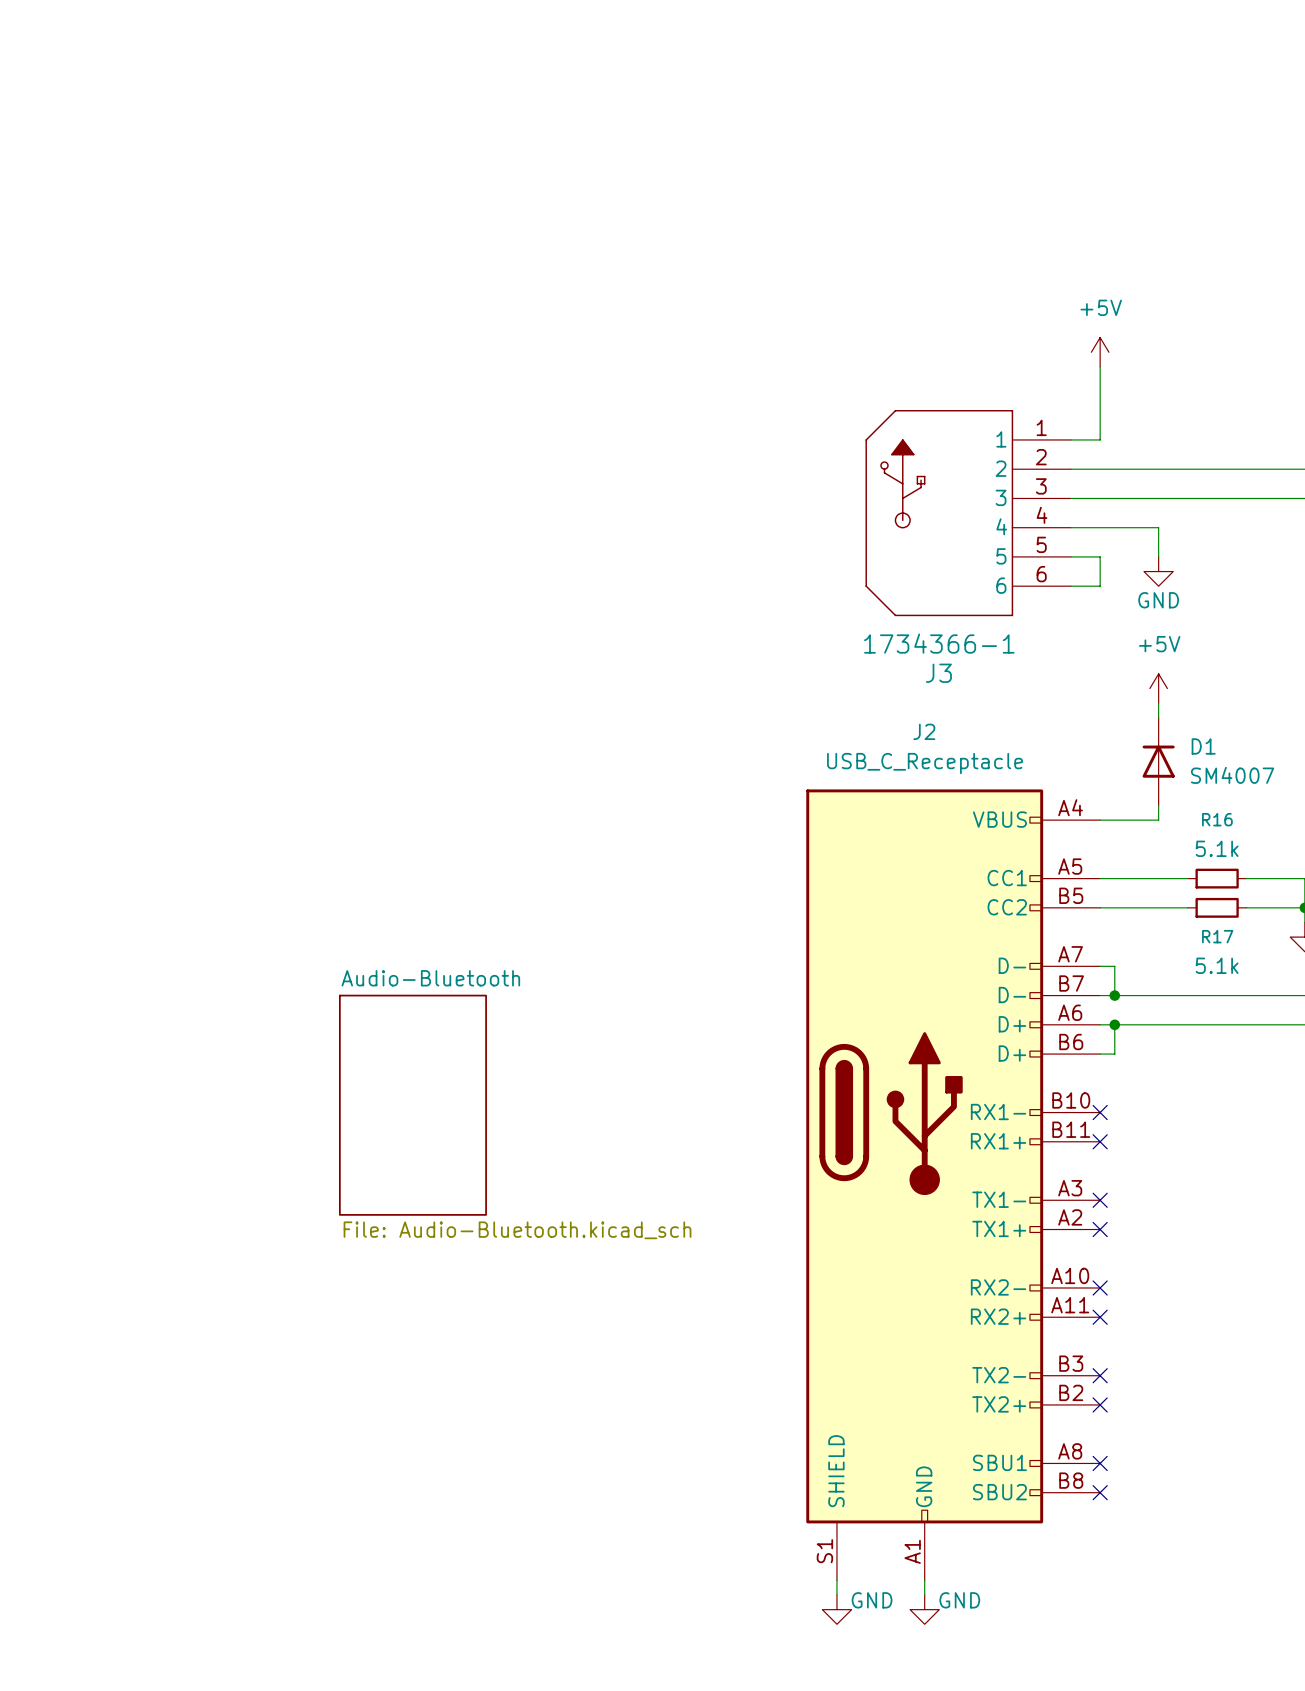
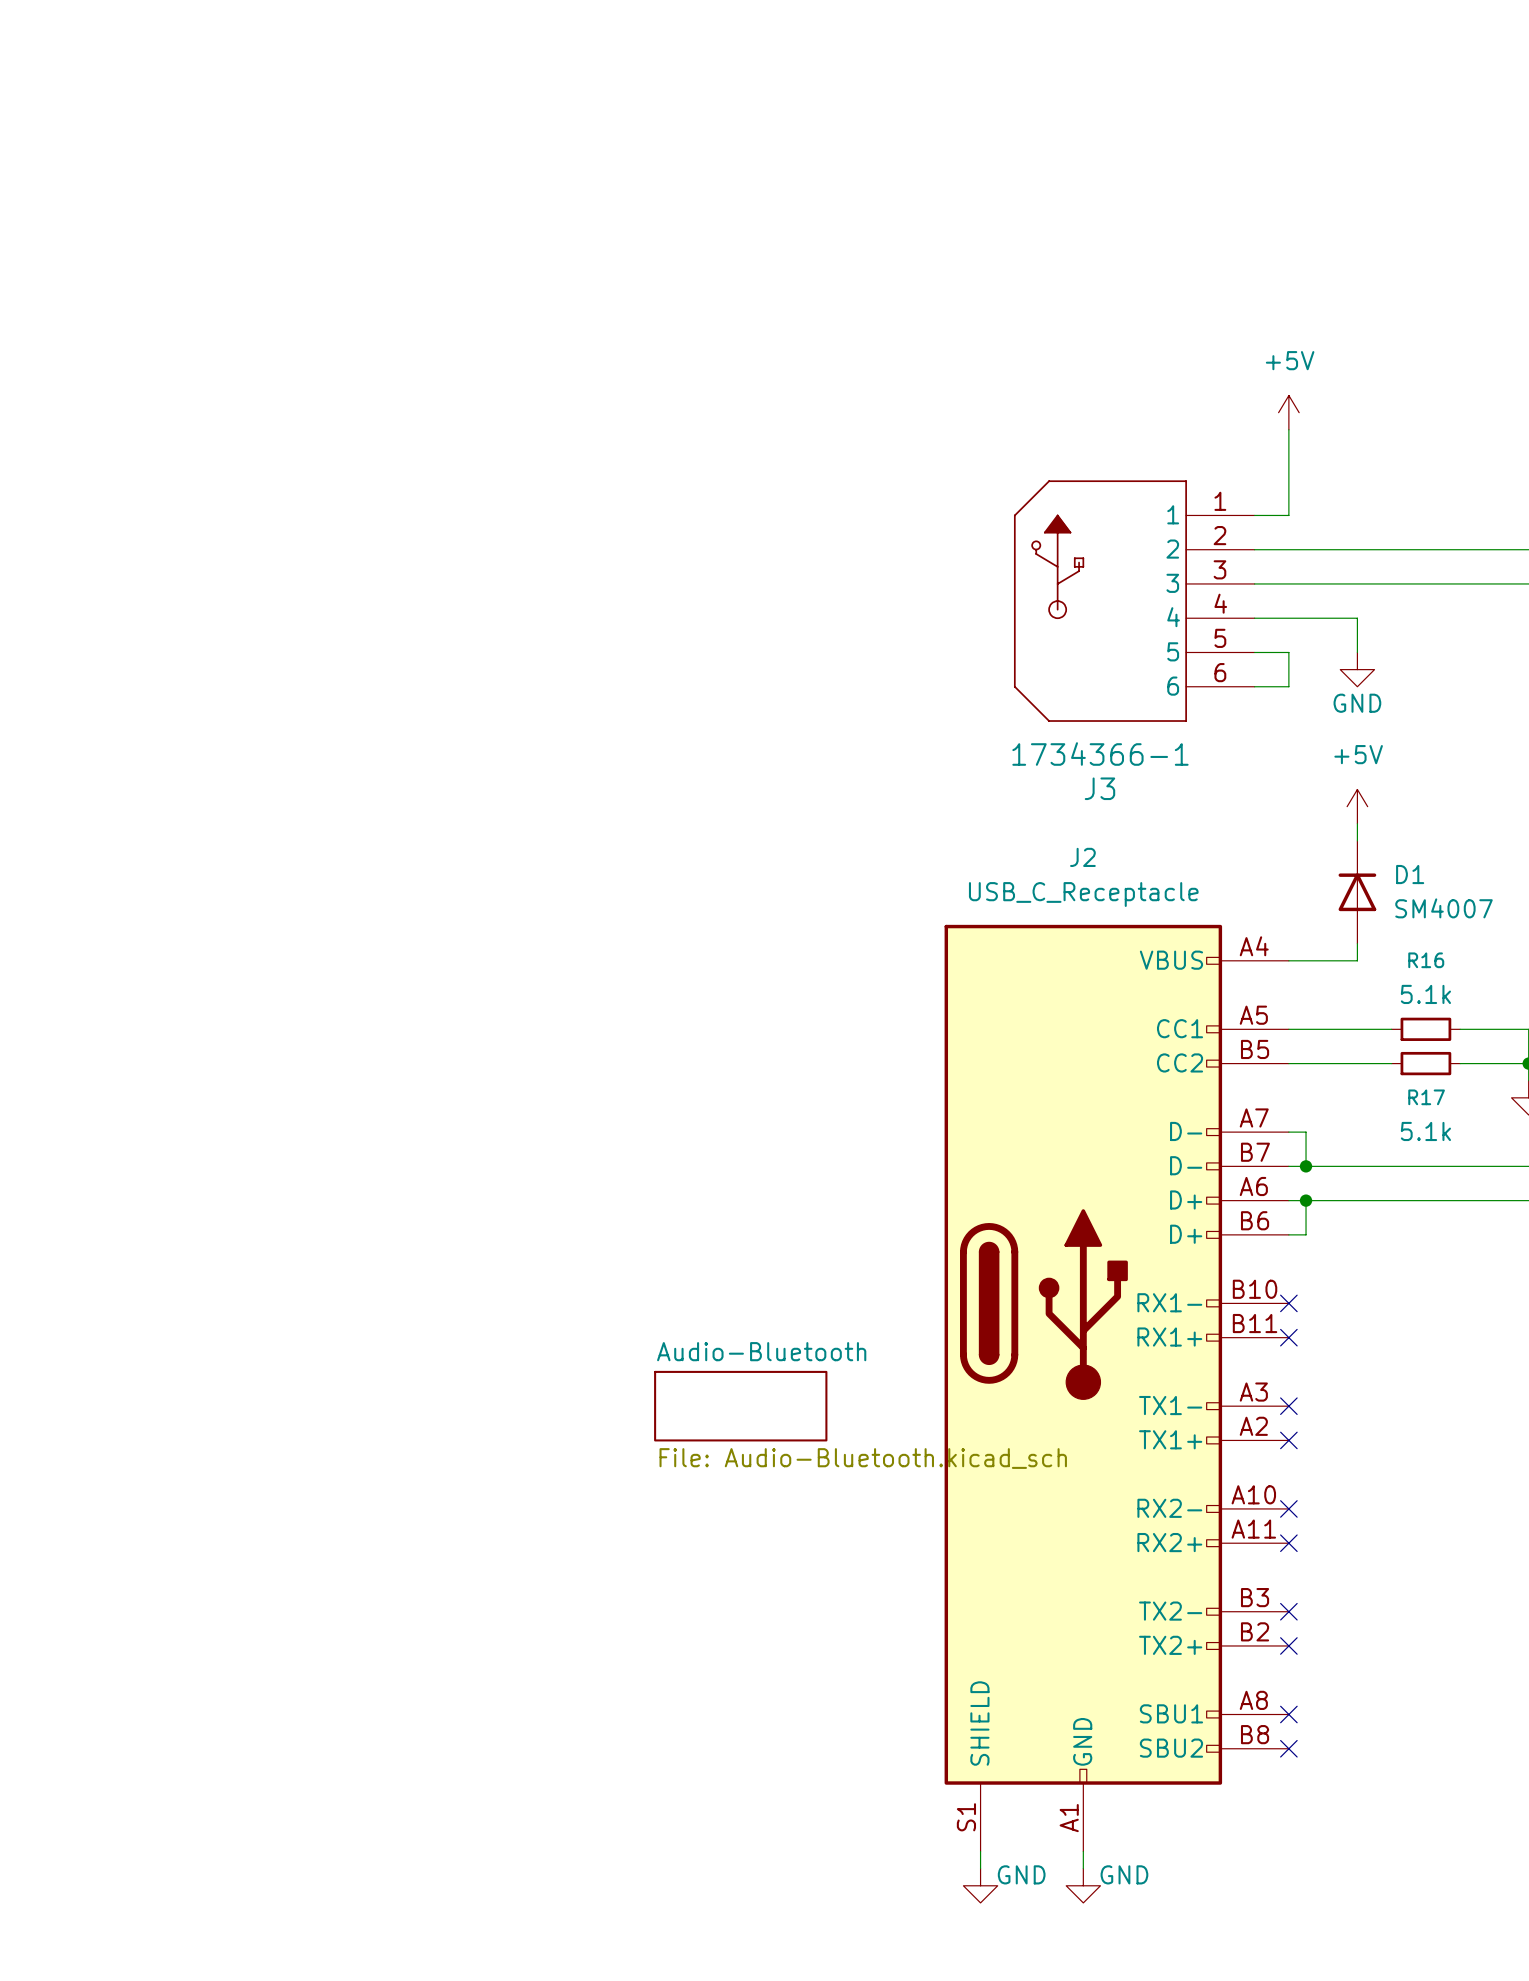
sheet Audio-Bluetooth: File: Audio-Bluetooth.kicad_sch (412, 1105) -> none
sheet Audio-Bluetooth: none -> File: Audio-Bluetooth.kicad_sch (740, 1406)

